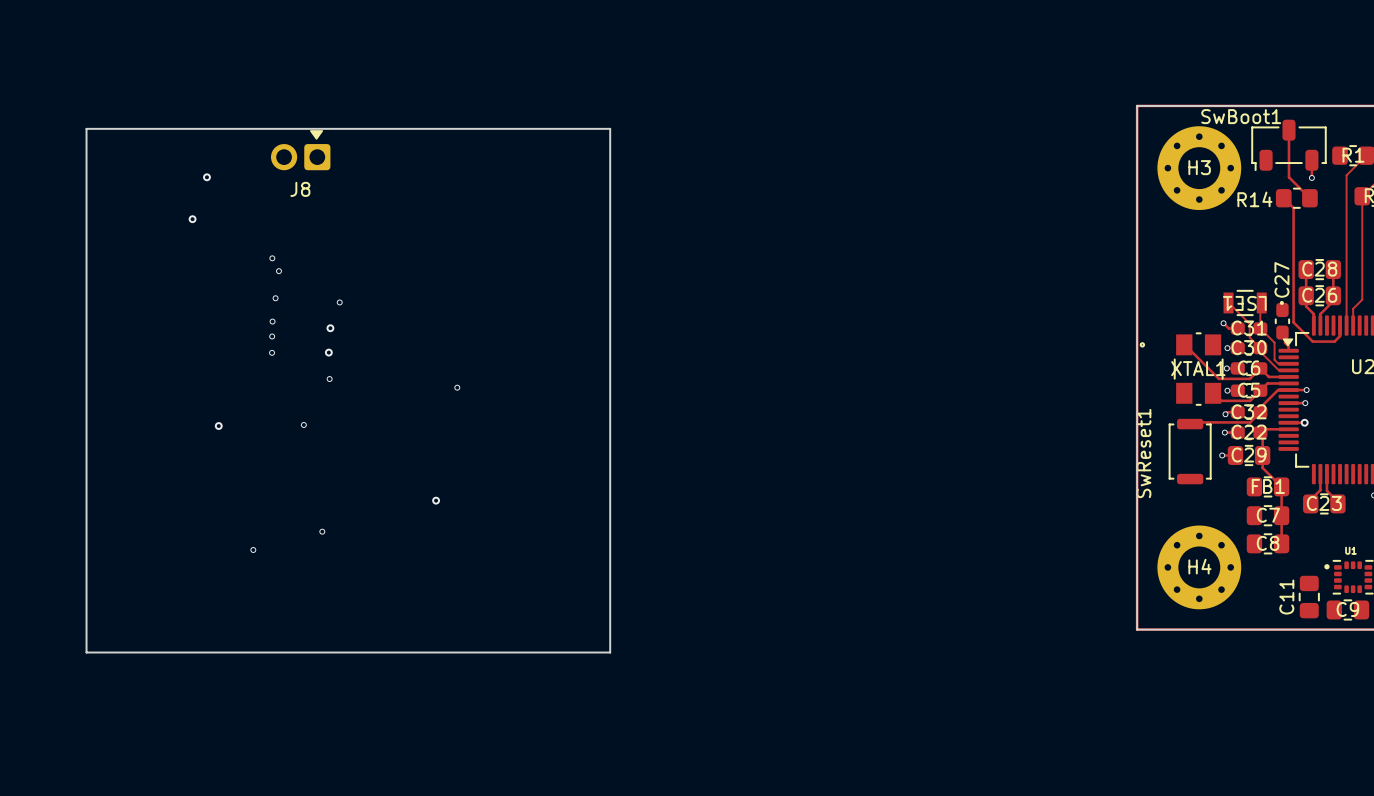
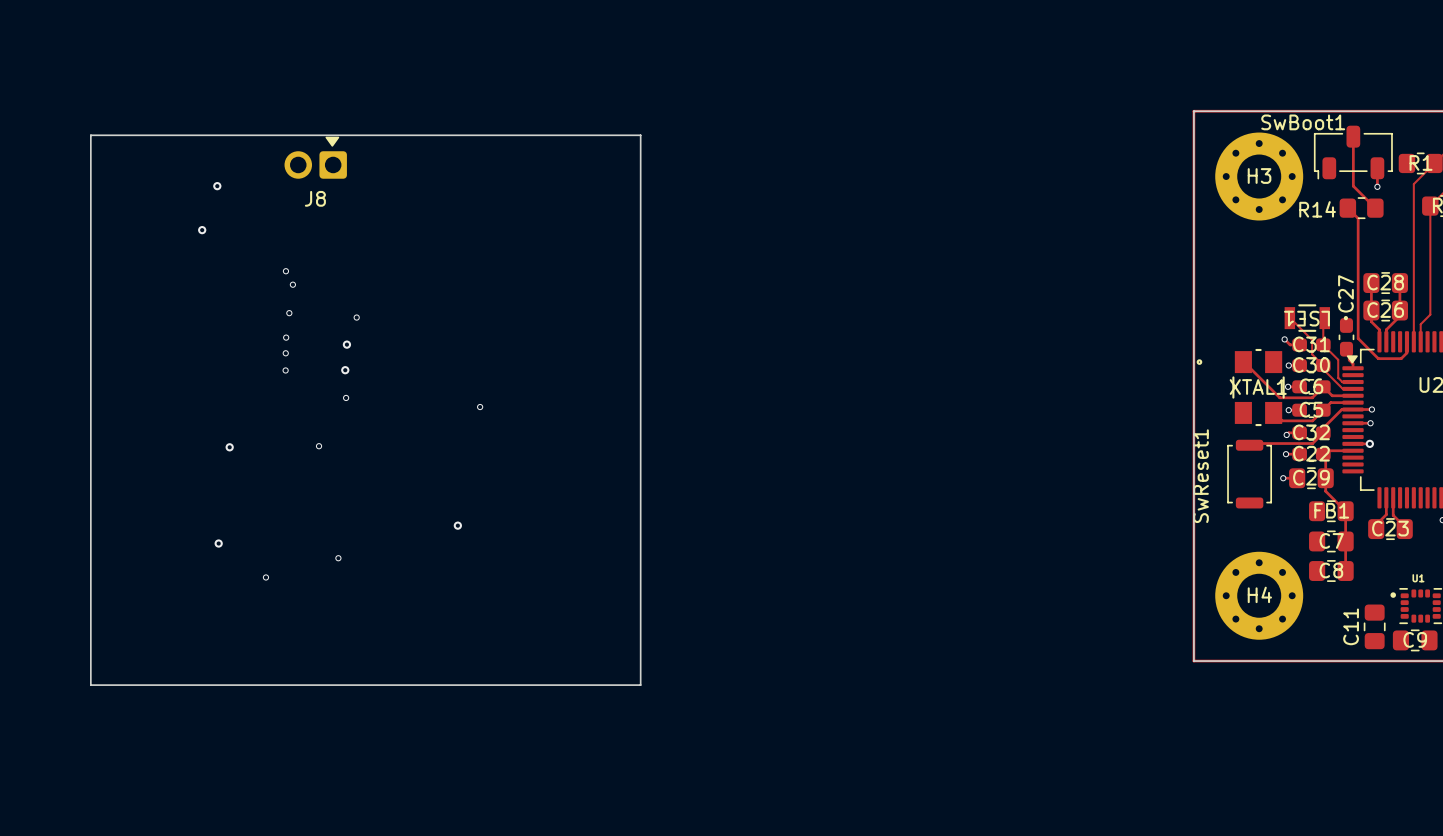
via: none -> (218, 543)

